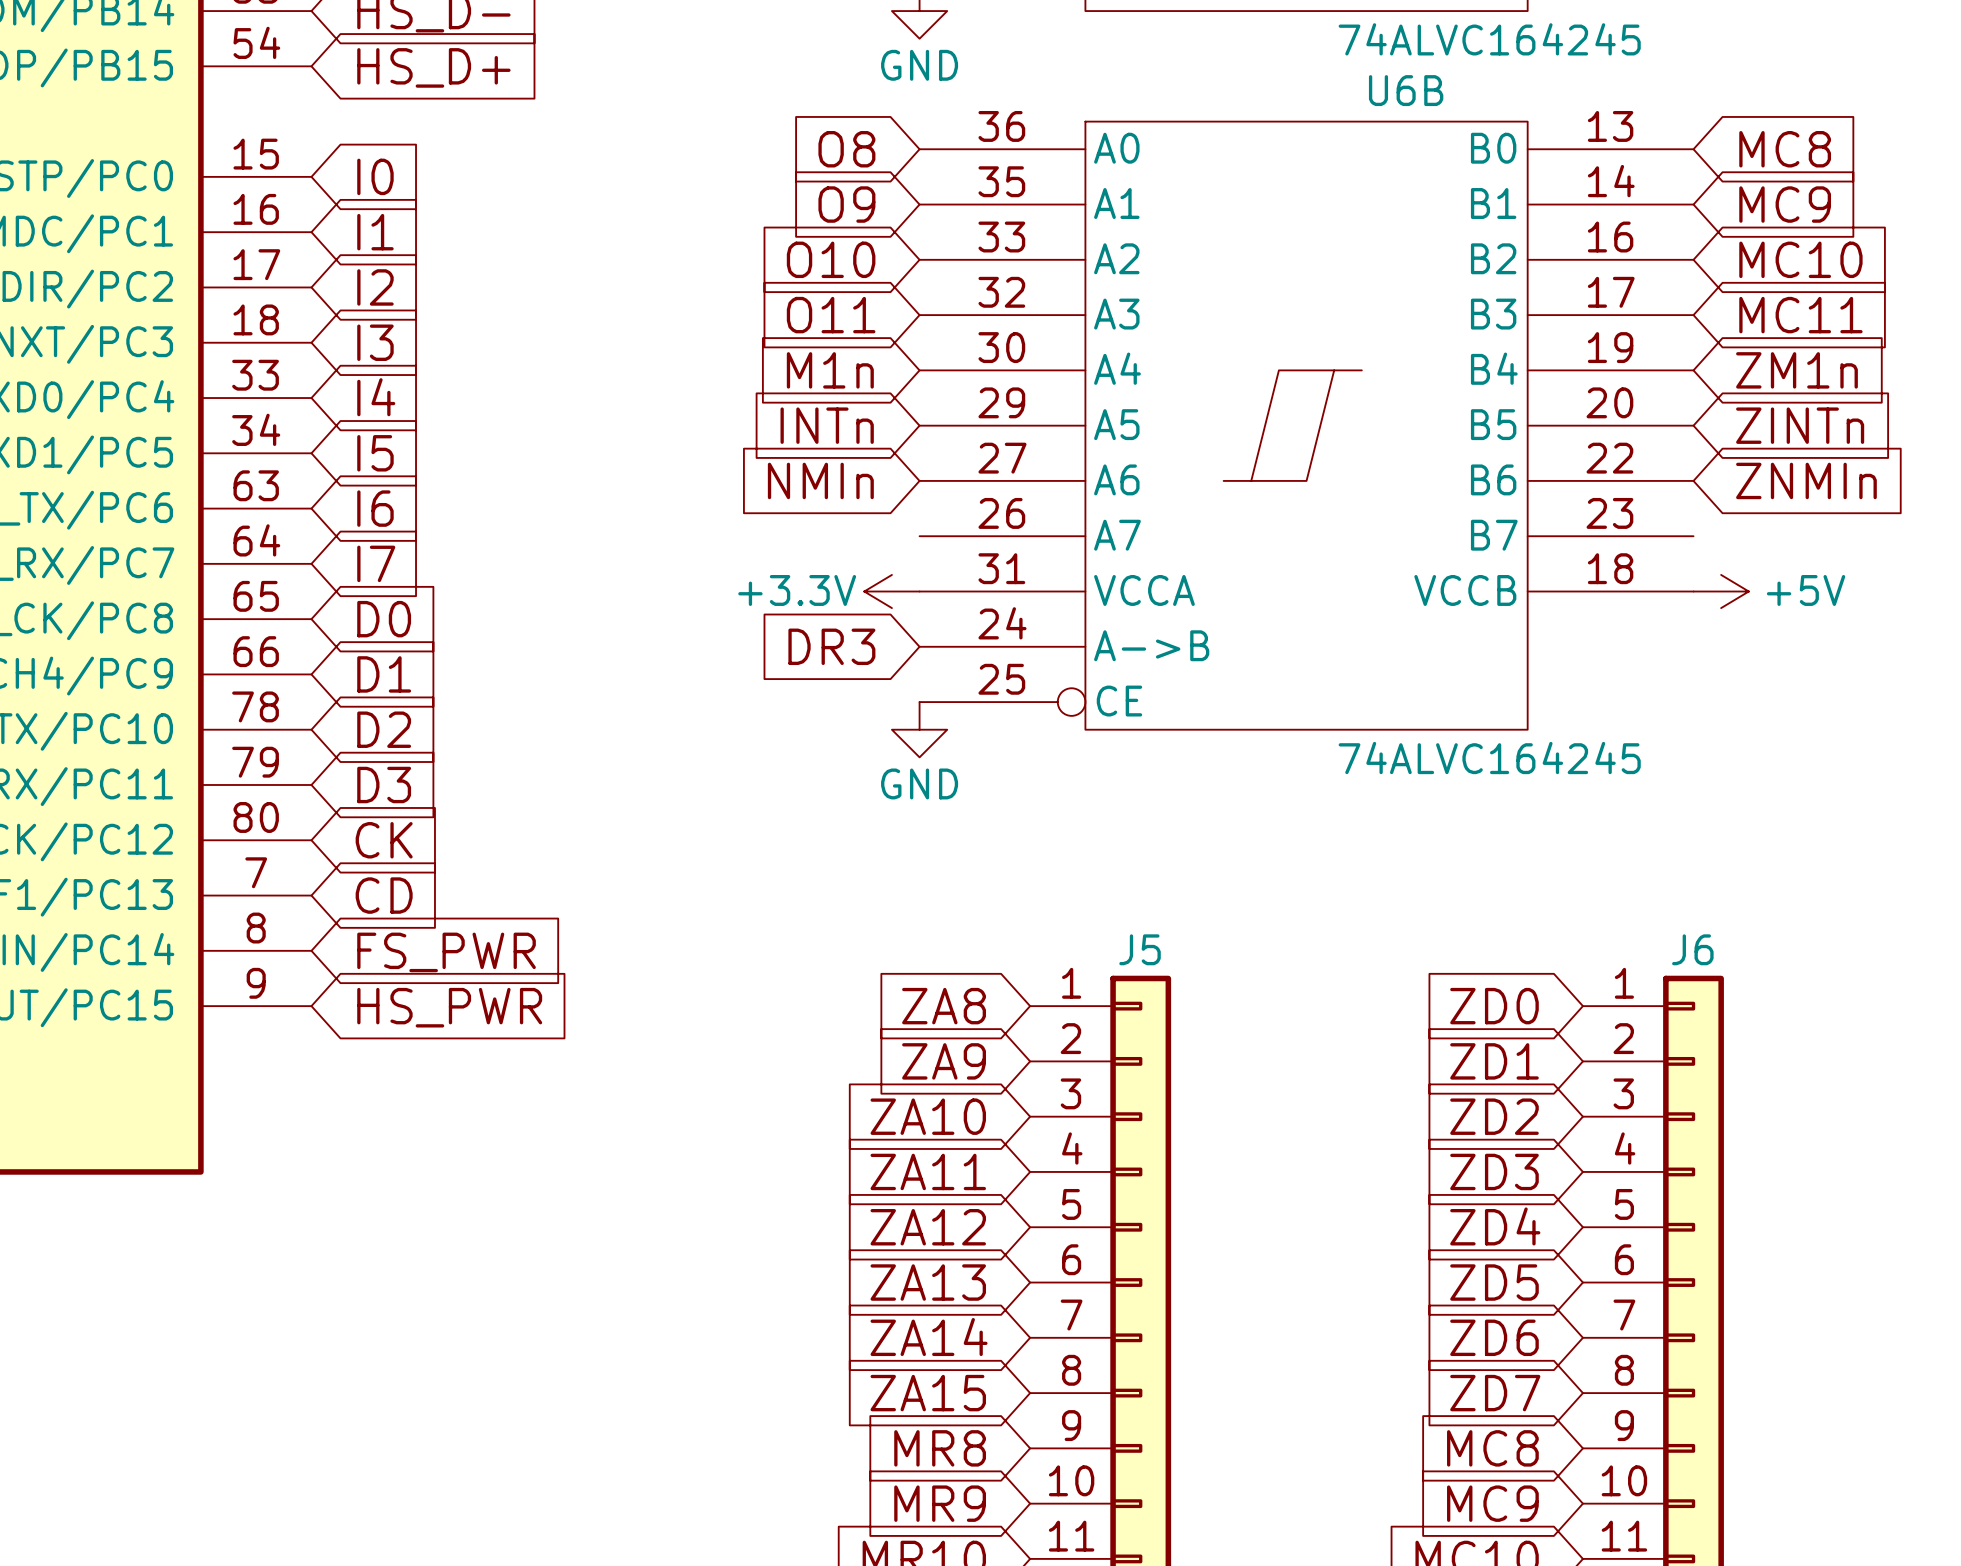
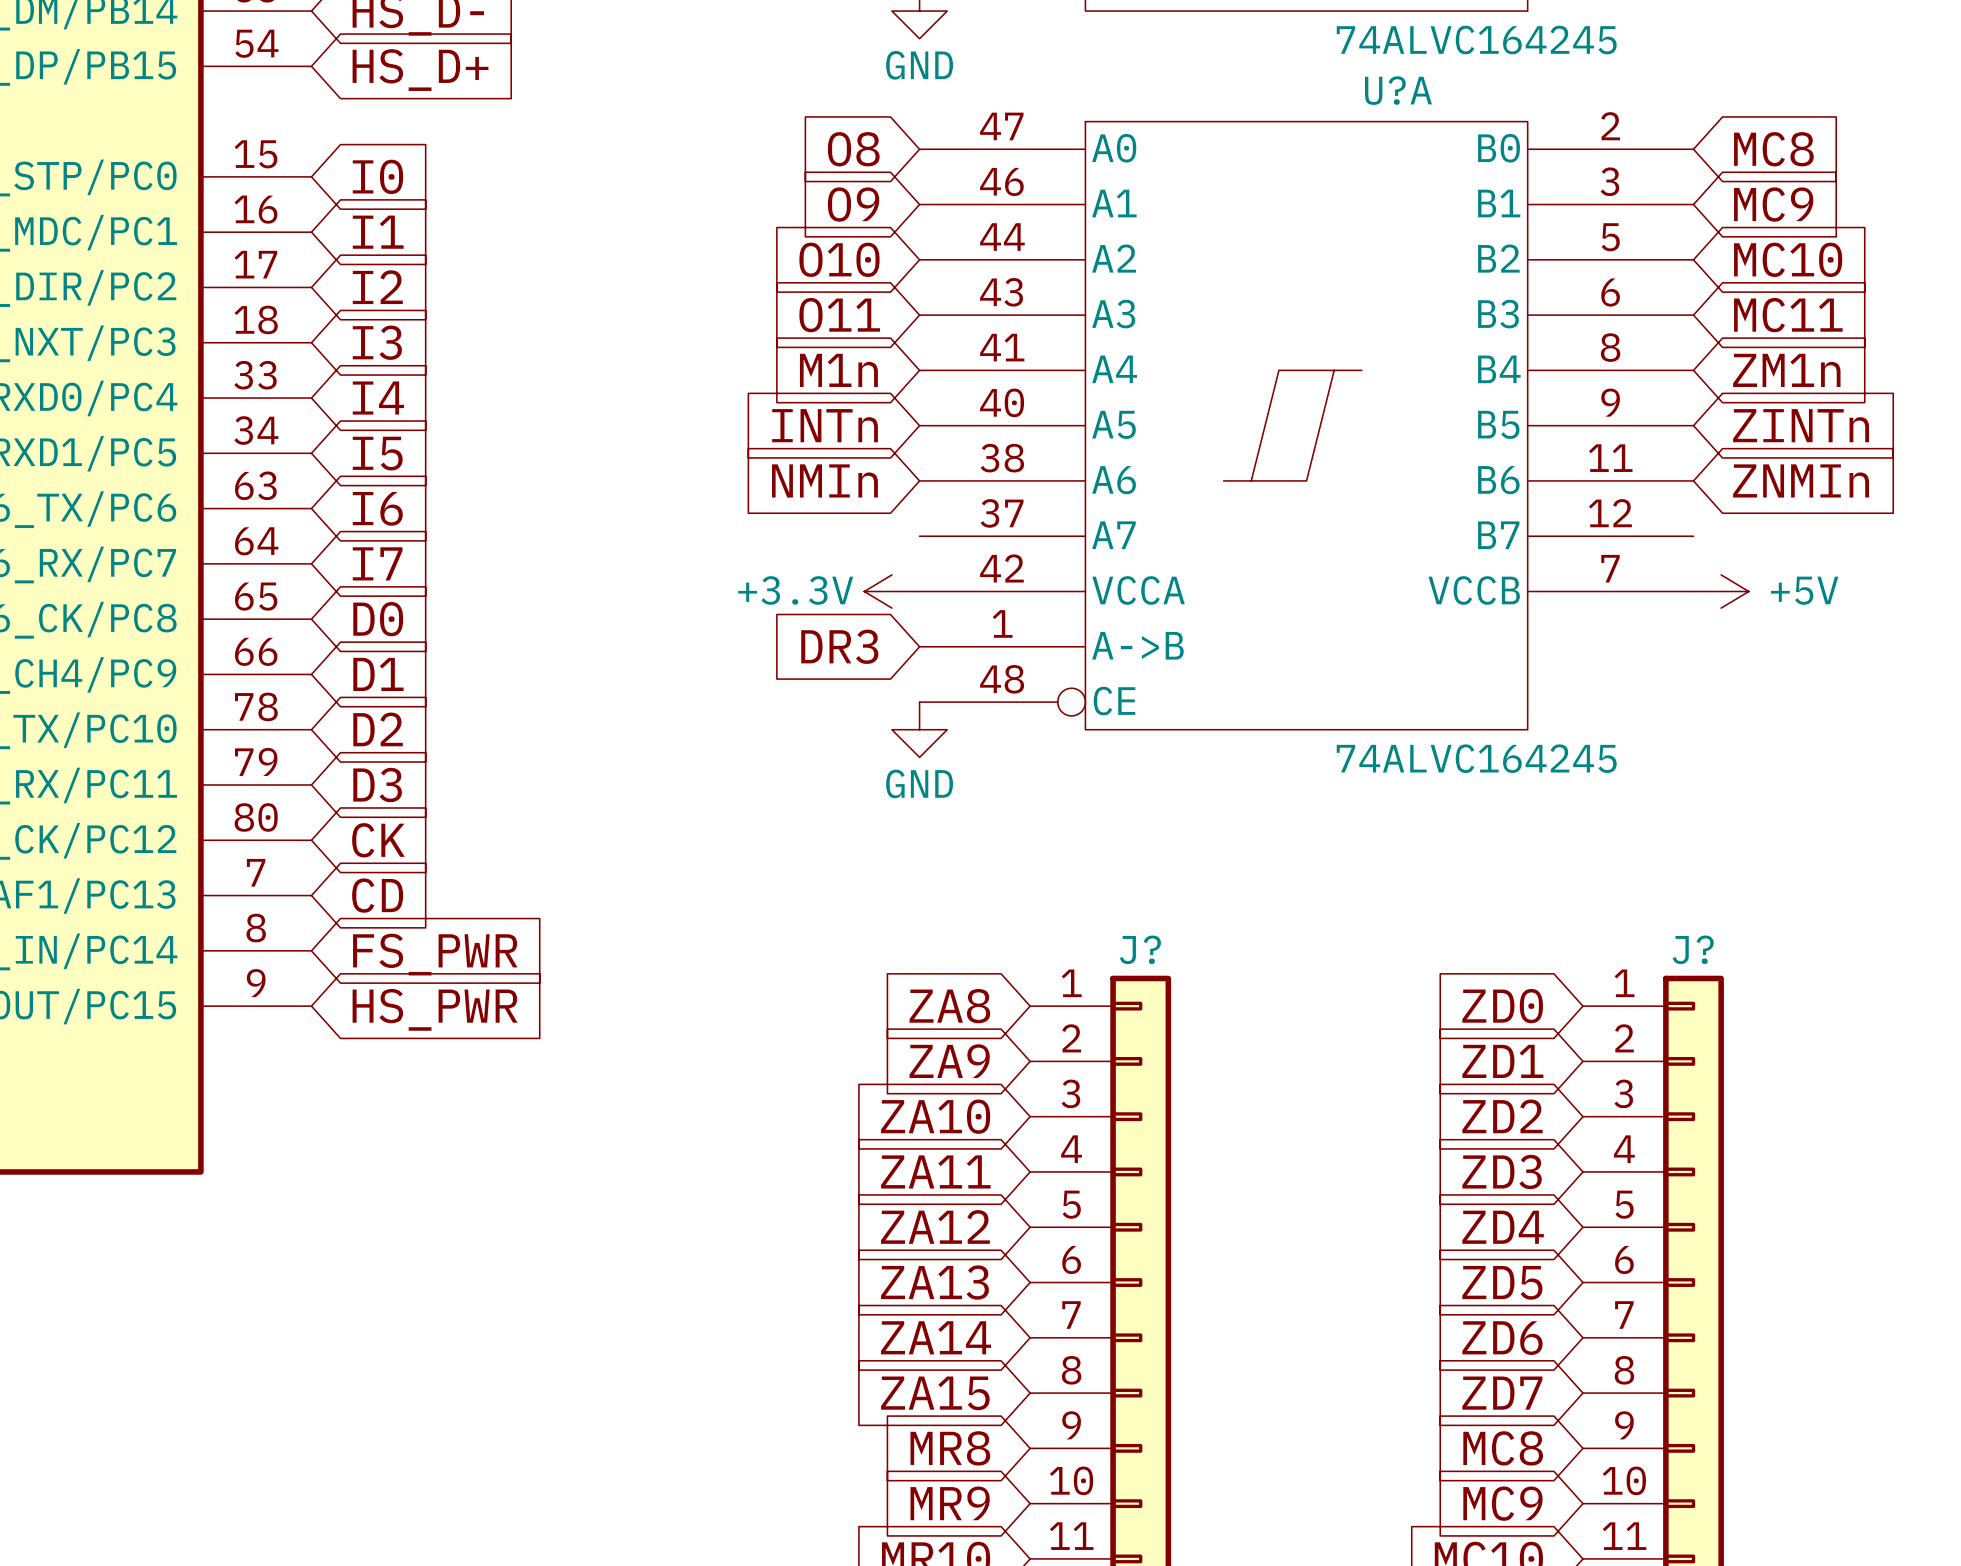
U6B name: U6B (1406, 90) -> U?A (1398, 90)
U6B symbol: [919, 121, 1694, 730] -> [919, 121, 1694, 730]
J5 name: J5 (1140, 949) -> J? (1140, 949)
J6 name: J6 (1692, 949) -> J? (1693, 949)

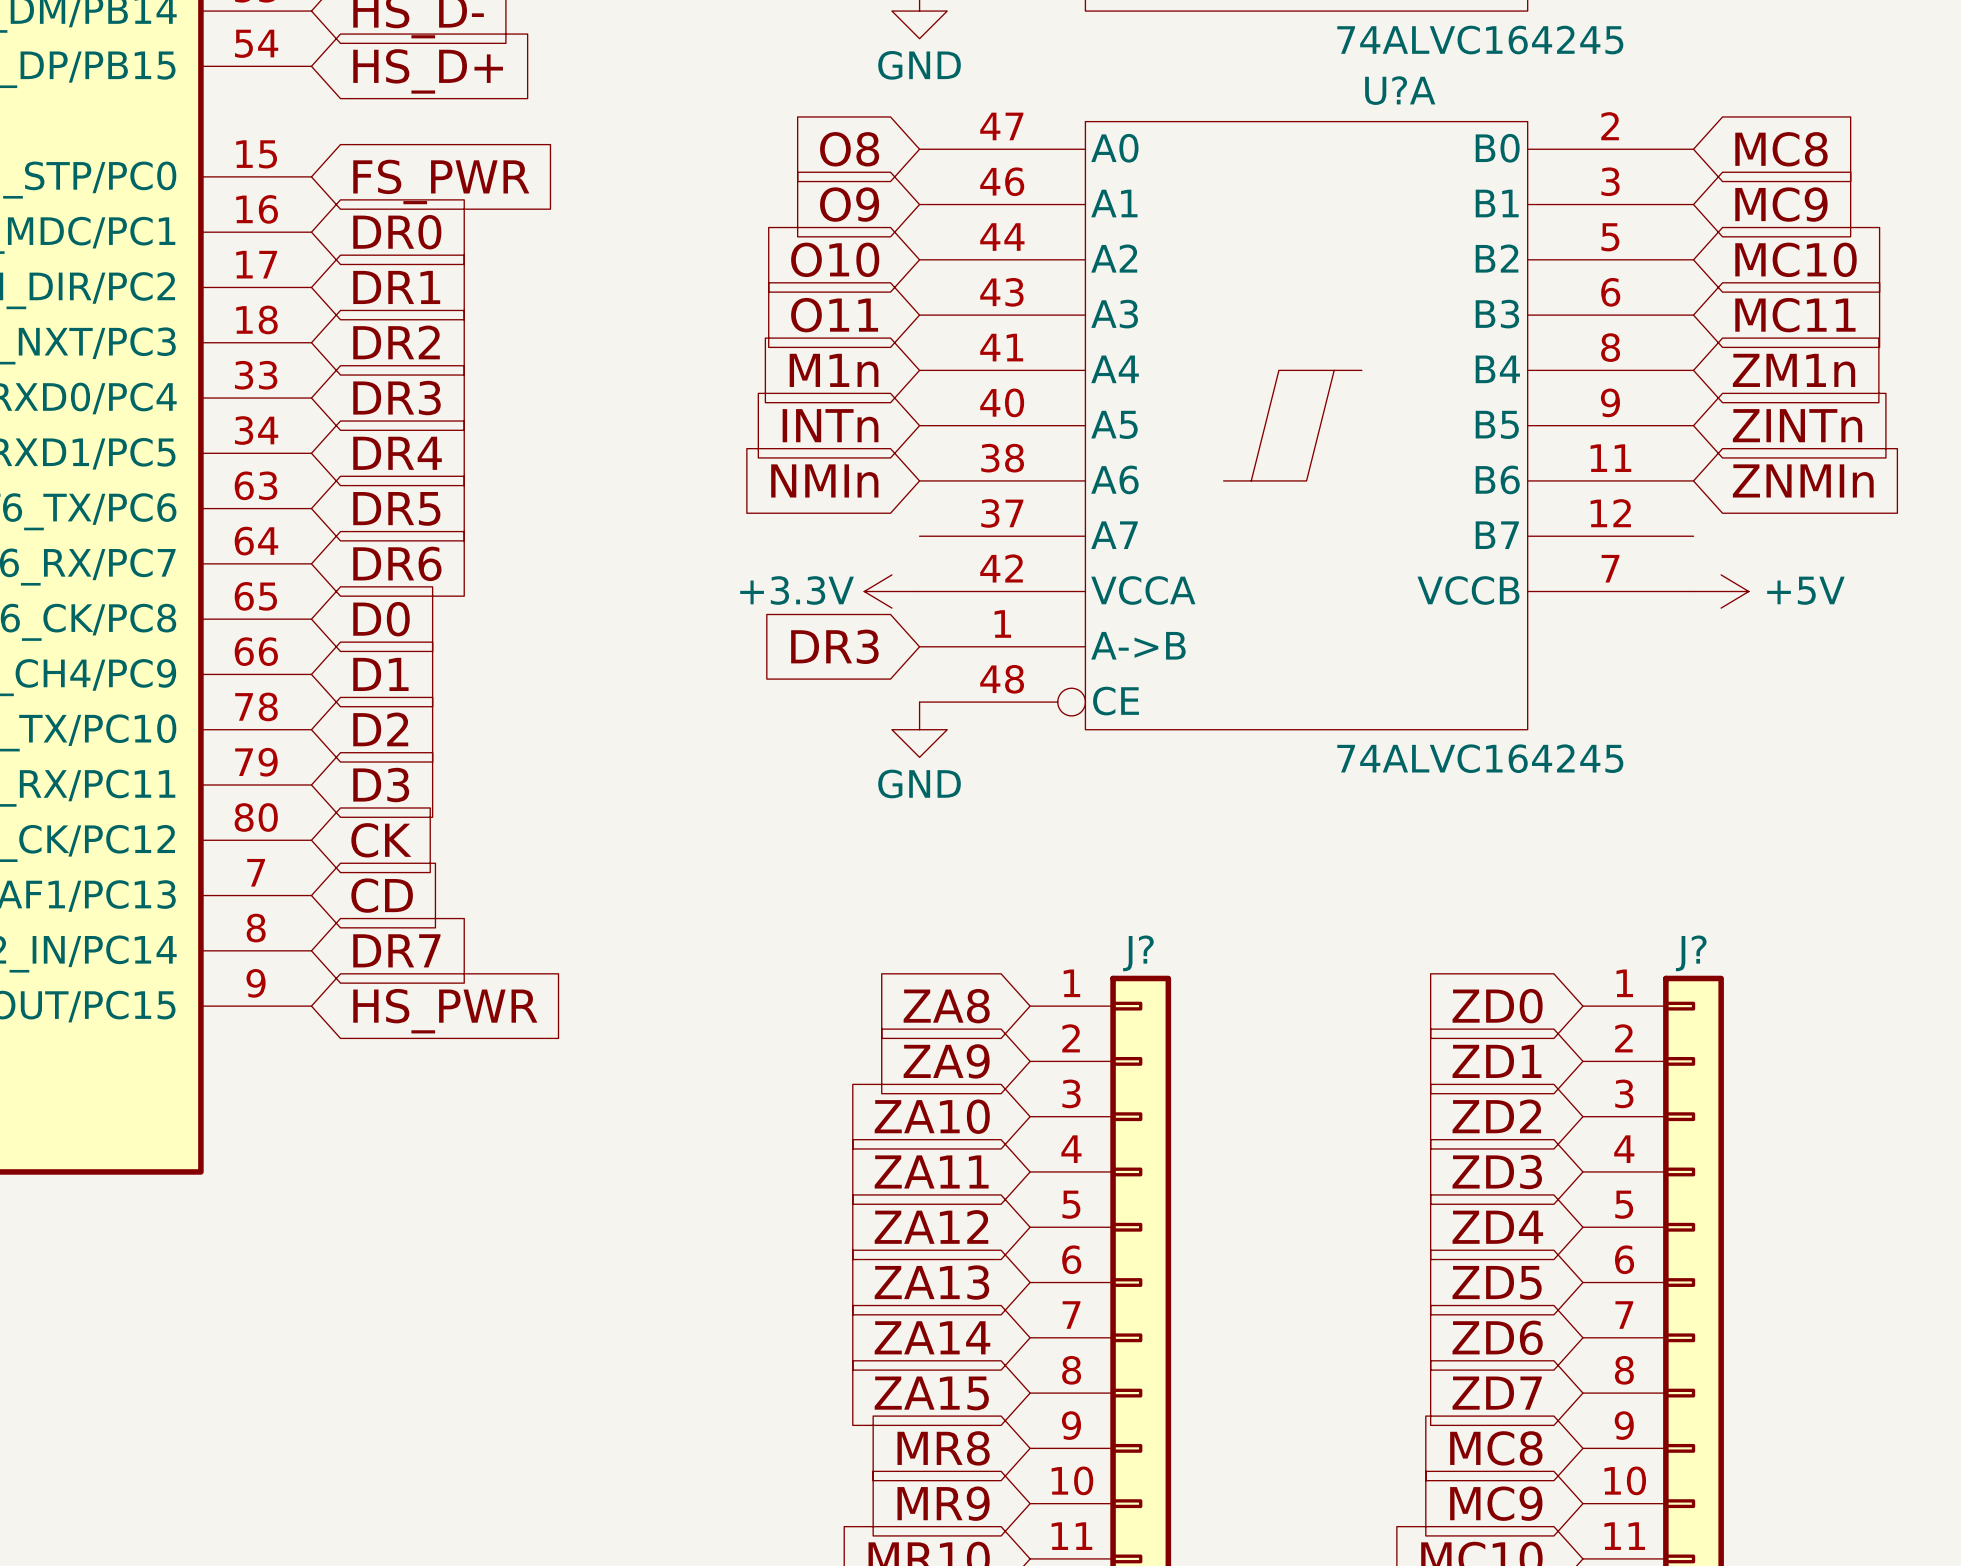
global label: I0 (377, 176) -> FS_PWR (441, 181)
global label: I1 (378, 232) -> DR0 (397, 232)
global label: I2 (377, 287) -> DR1 (396, 287)
global label: I3 (377, 342) -> DR2 (396, 342)
global label: I4 (378, 398) -> DR3 (396, 398)
global label: I5 (377, 453) -> DR4 (397, 453)
global label: I6 (377, 508) -> DR5 (396, 508)
global label: I7 (377, 563) -> DR6 (397, 563)
global label: FS_PWR (435, 954) -> DR7 (396, 950)

